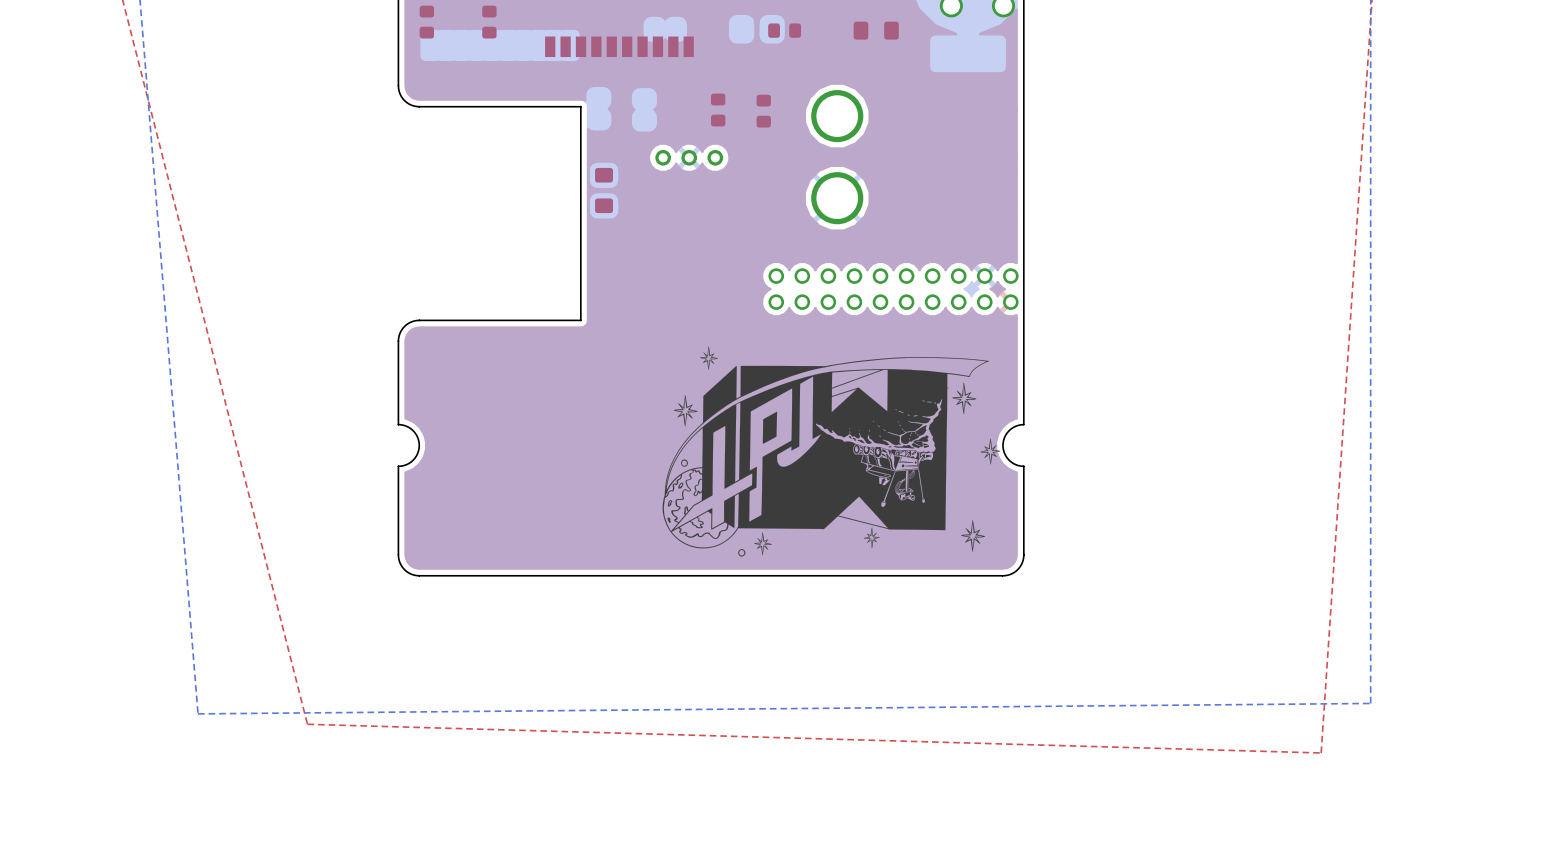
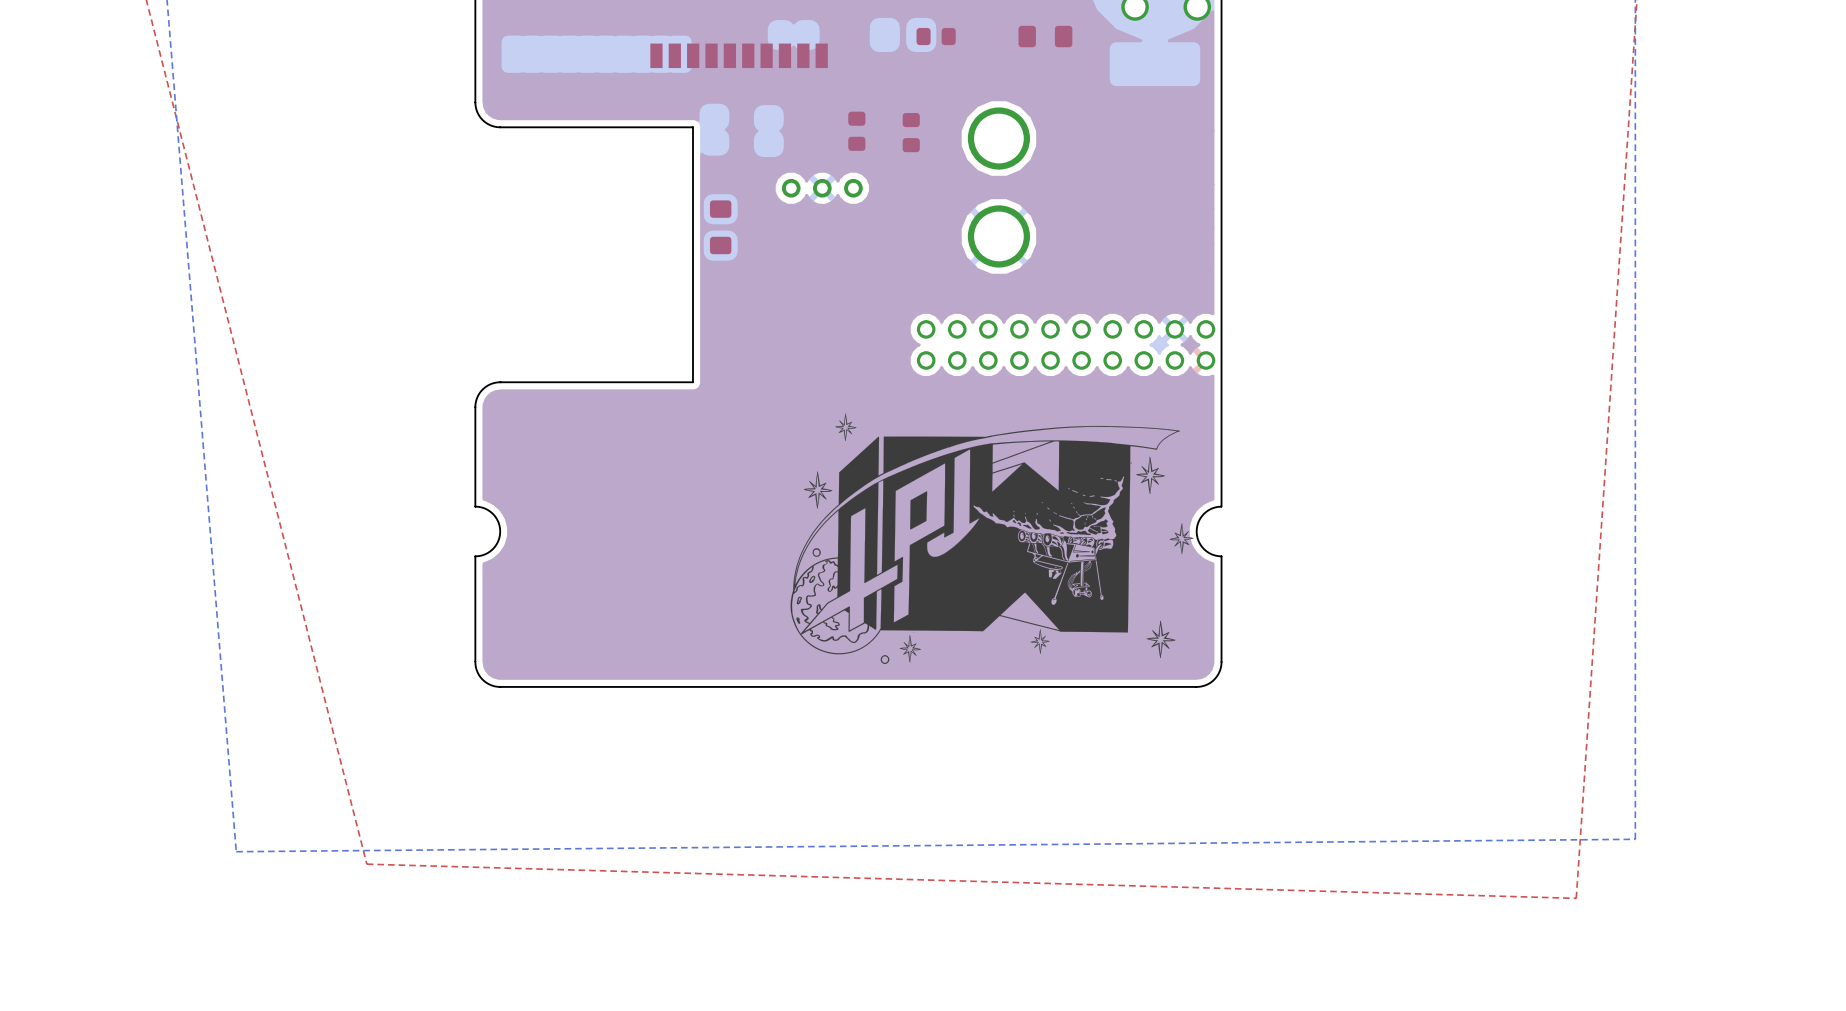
part: (426, 22) -> none
part: (489, 22) -> none

